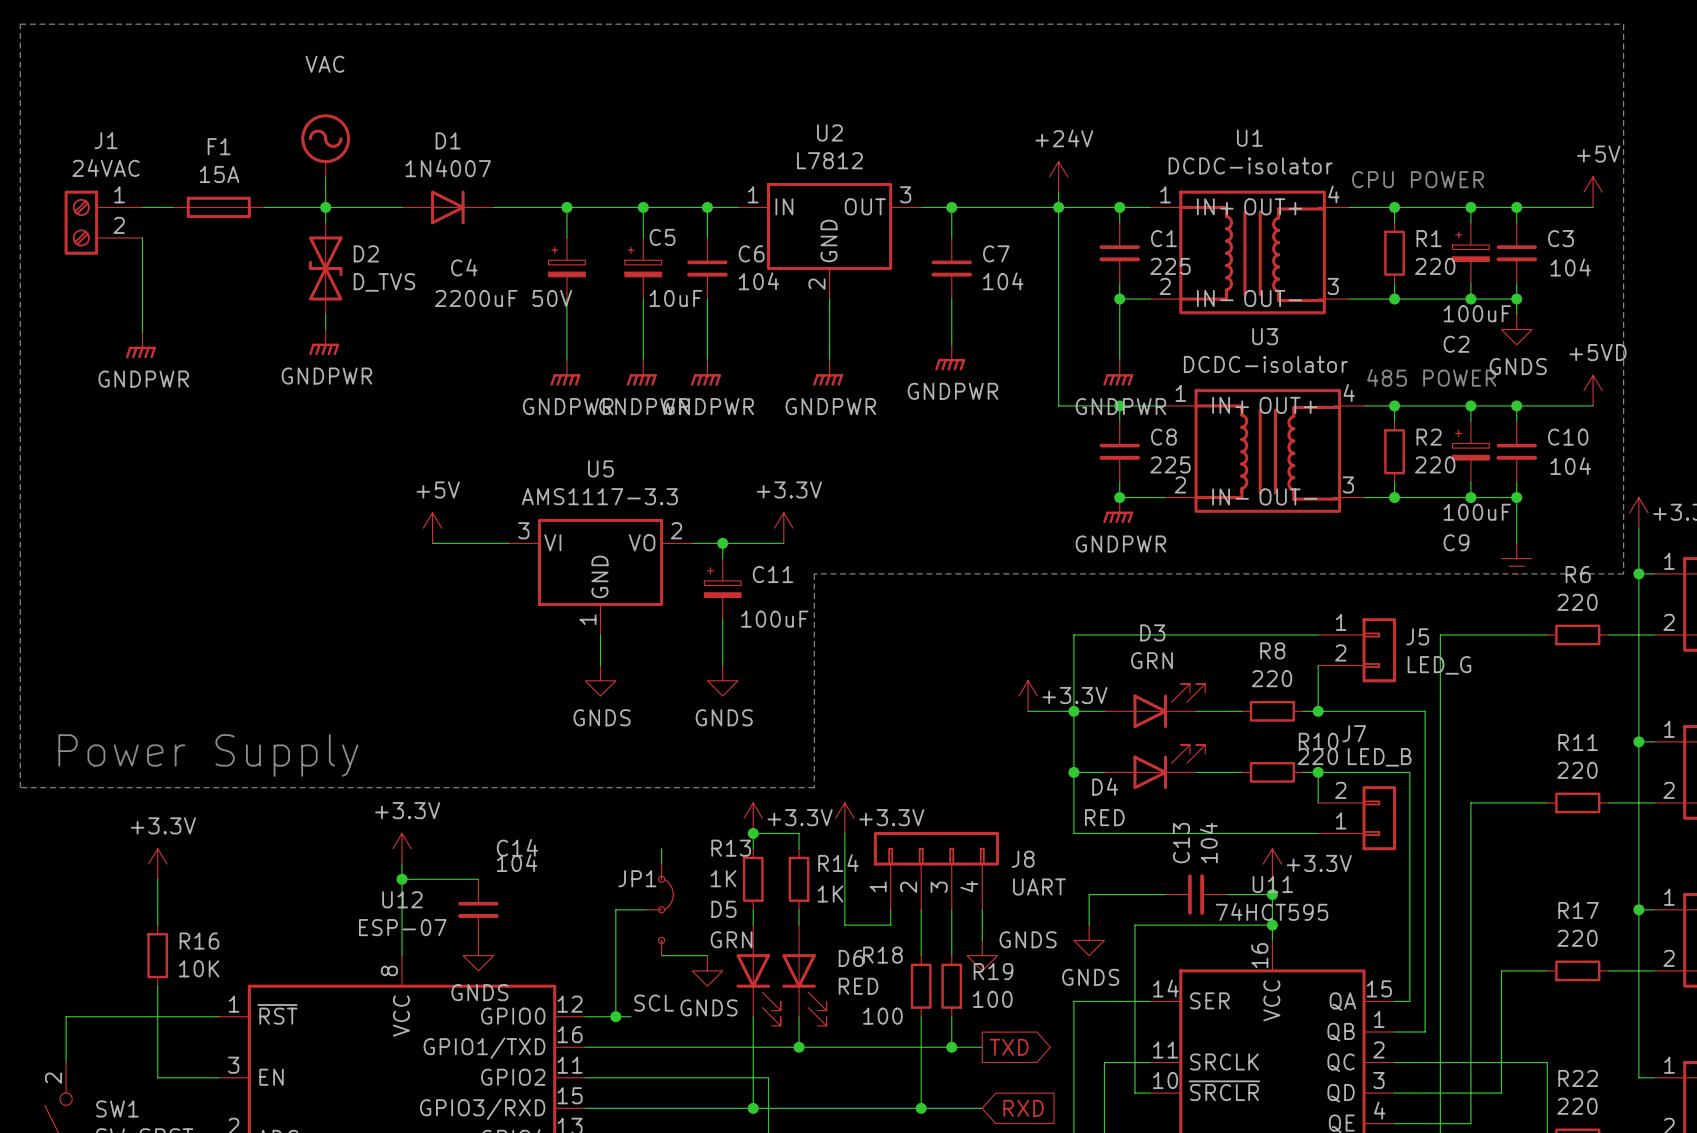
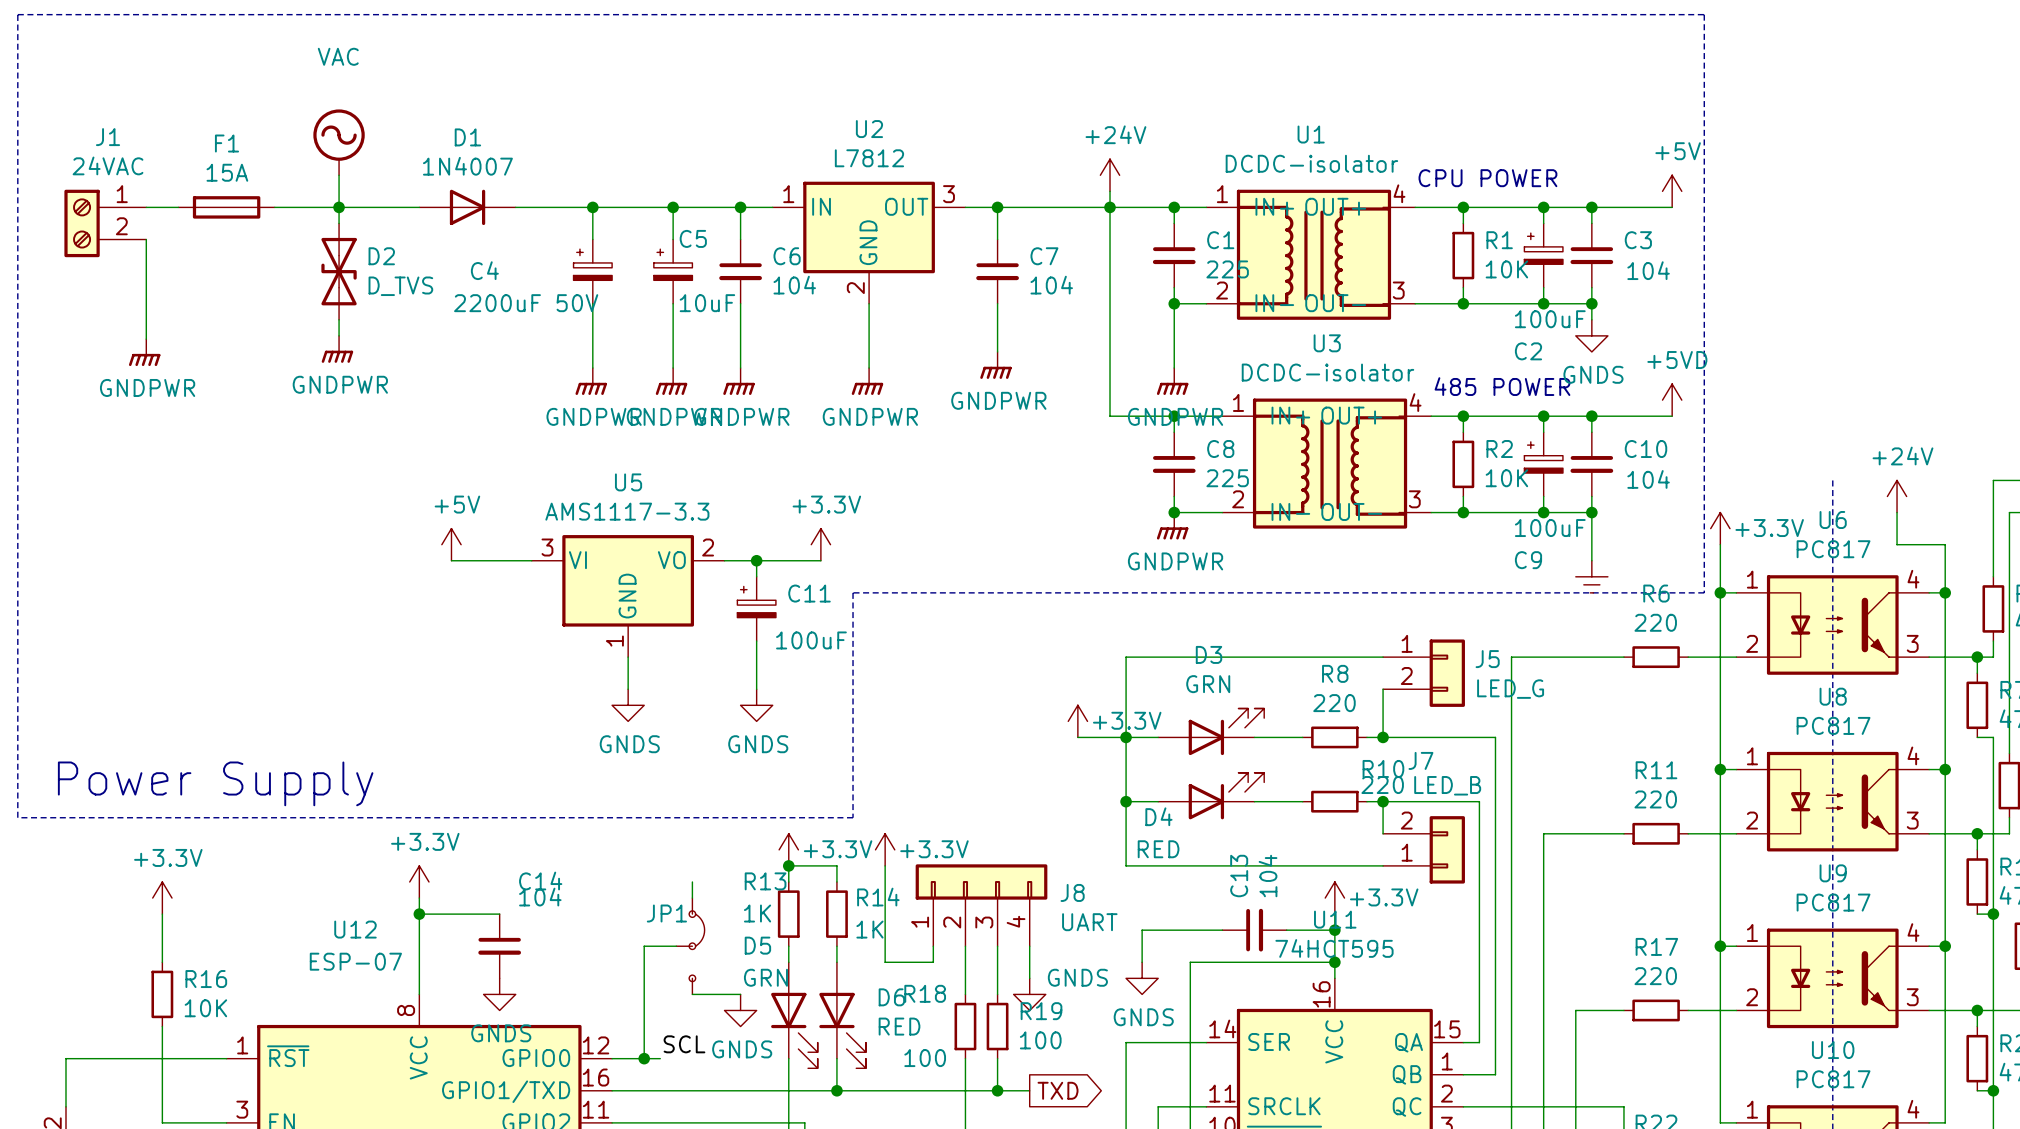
R1 value: 220 (1435, 266) -> 10K (1506, 269)
R2 value: 220 (1435, 464) -> 10K (1506, 478)
U12 name position: U12 (402, 899) -> U12 (355, 929)
U12 value position: ESP-07 (402, 927) -> ESP-07 (355, 961)

